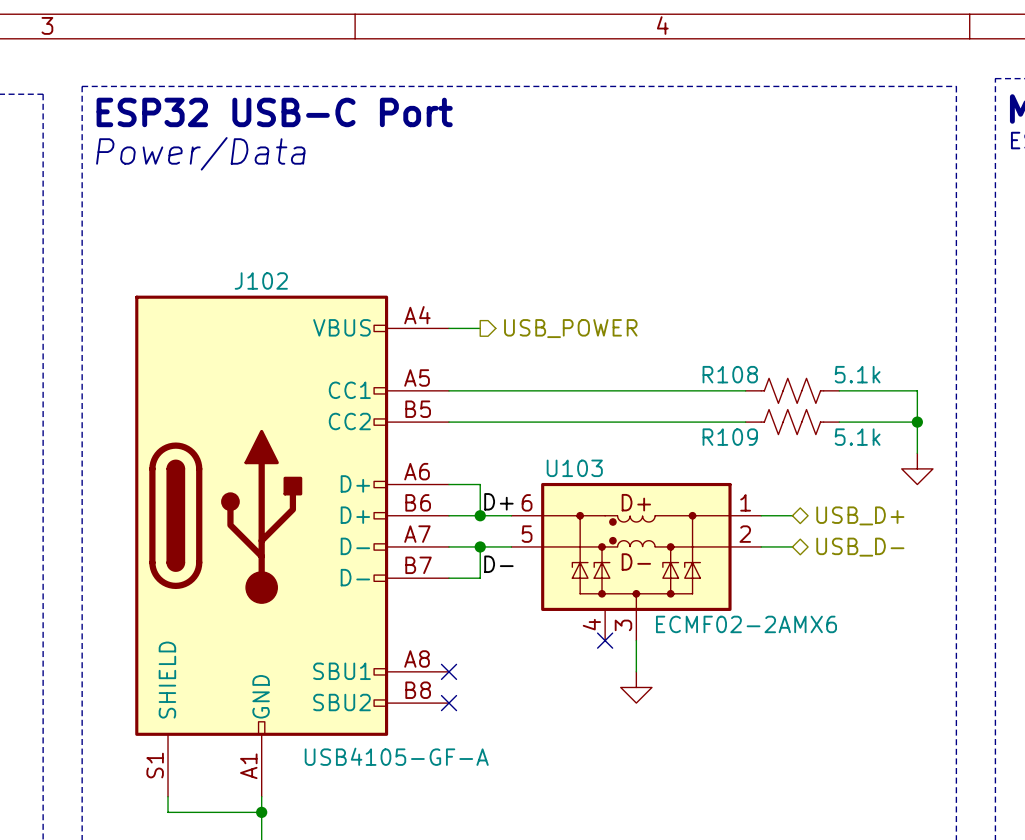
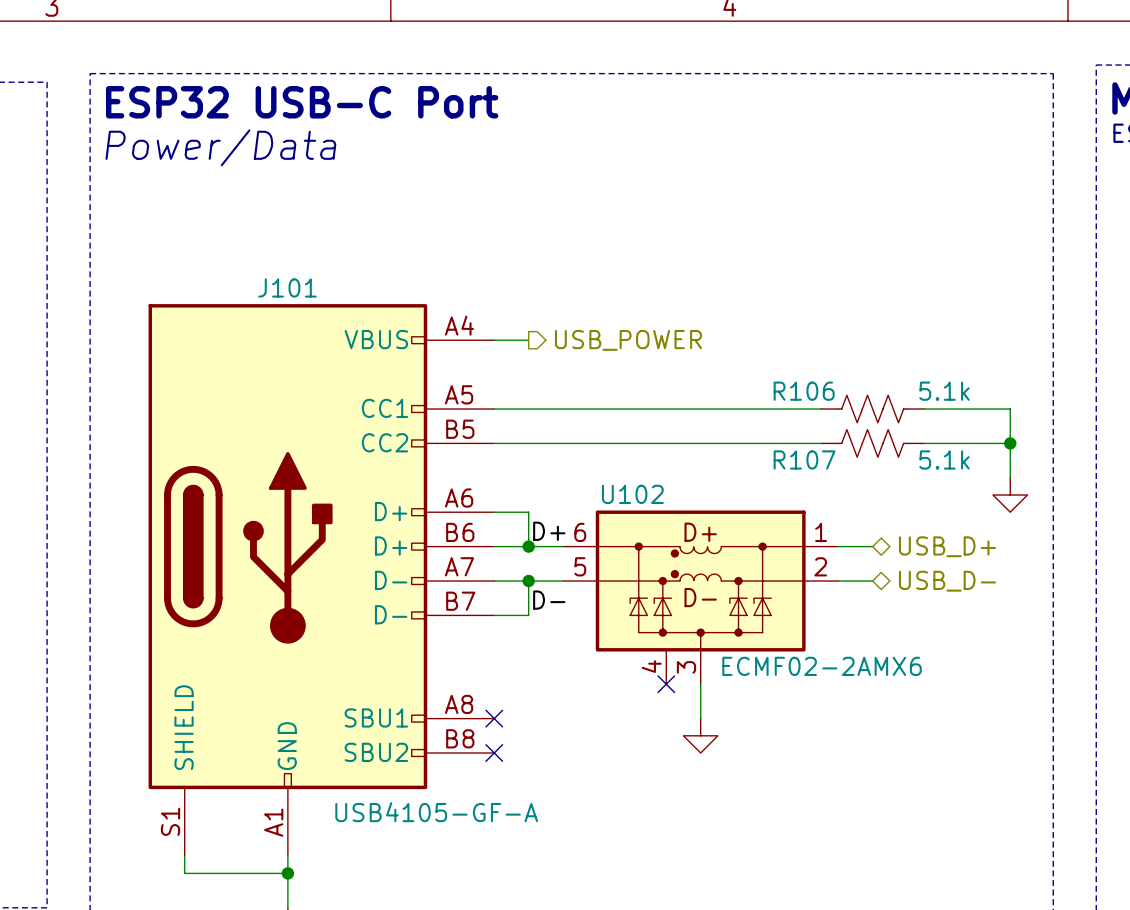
J102 name: J102 (261, 280) -> J101 (287, 287)
R108 name: R108 (730, 374) -> R106 (804, 391)
R109 name: R109 (730, 437) -> R107 (804, 459)
U103 name: U103 (574, 468) -> U102 (632, 494)

